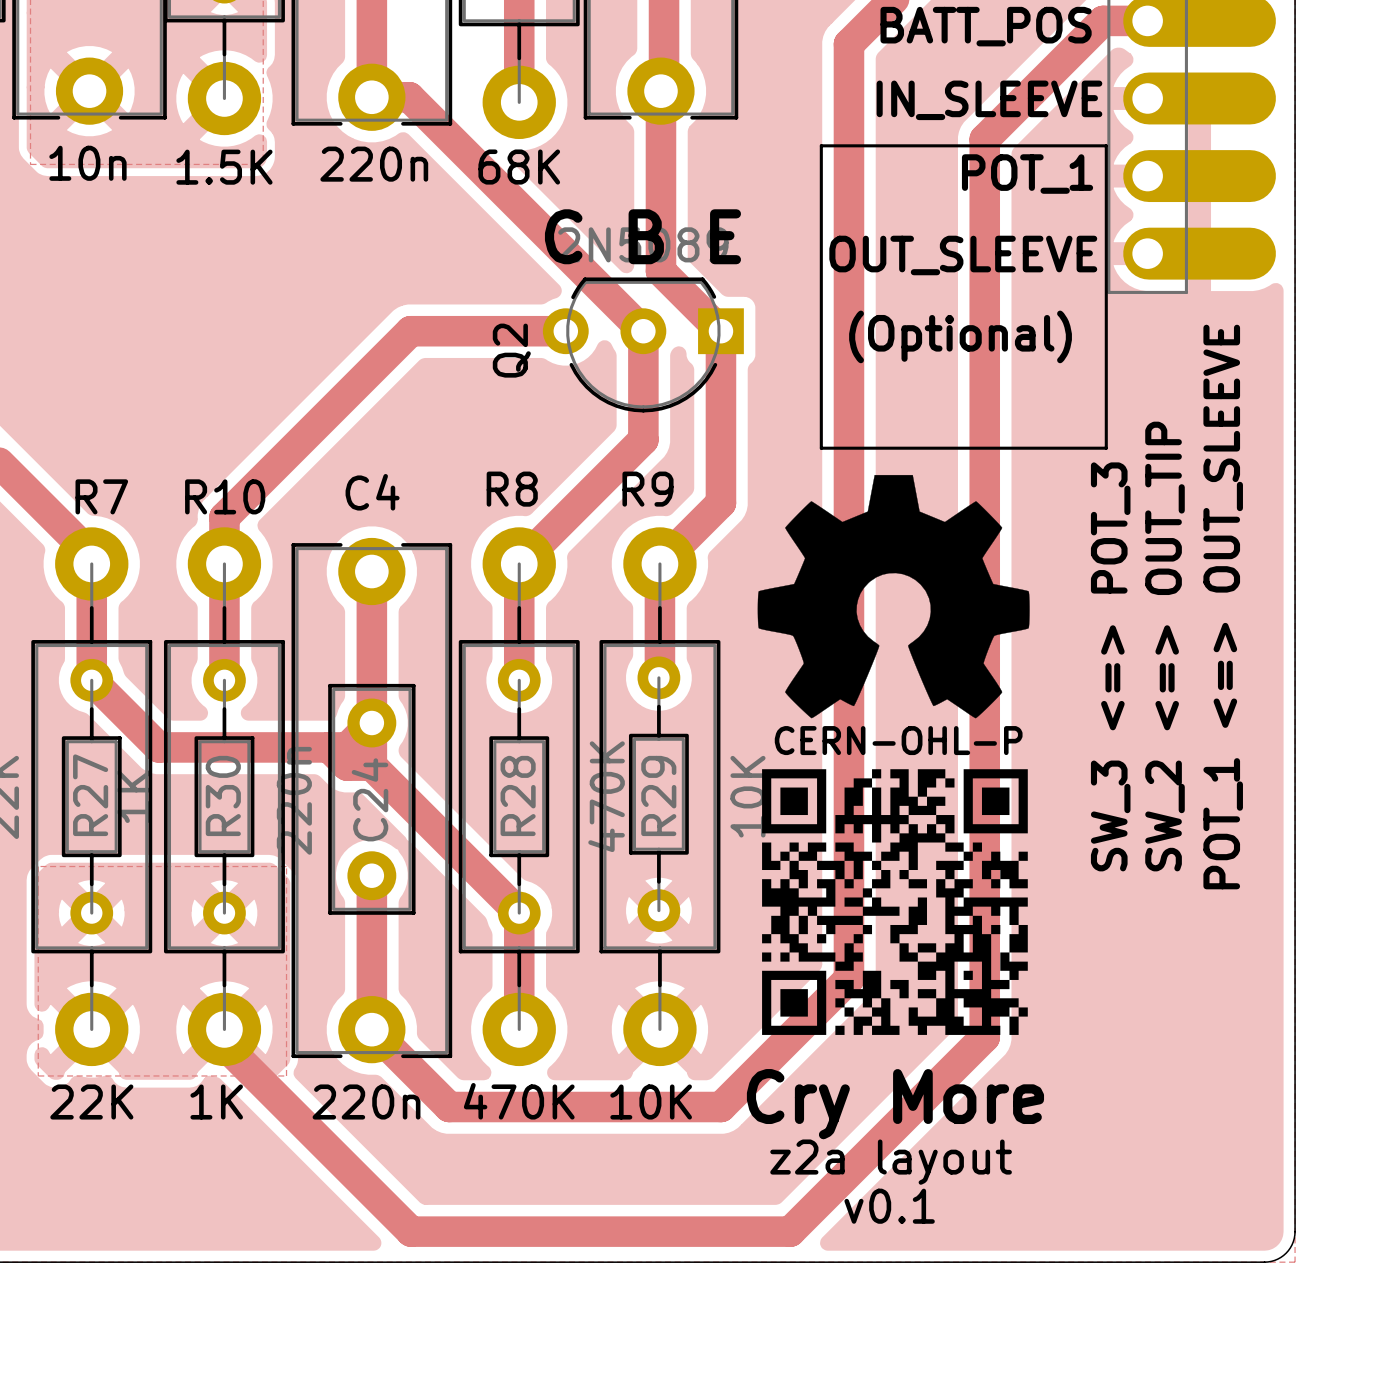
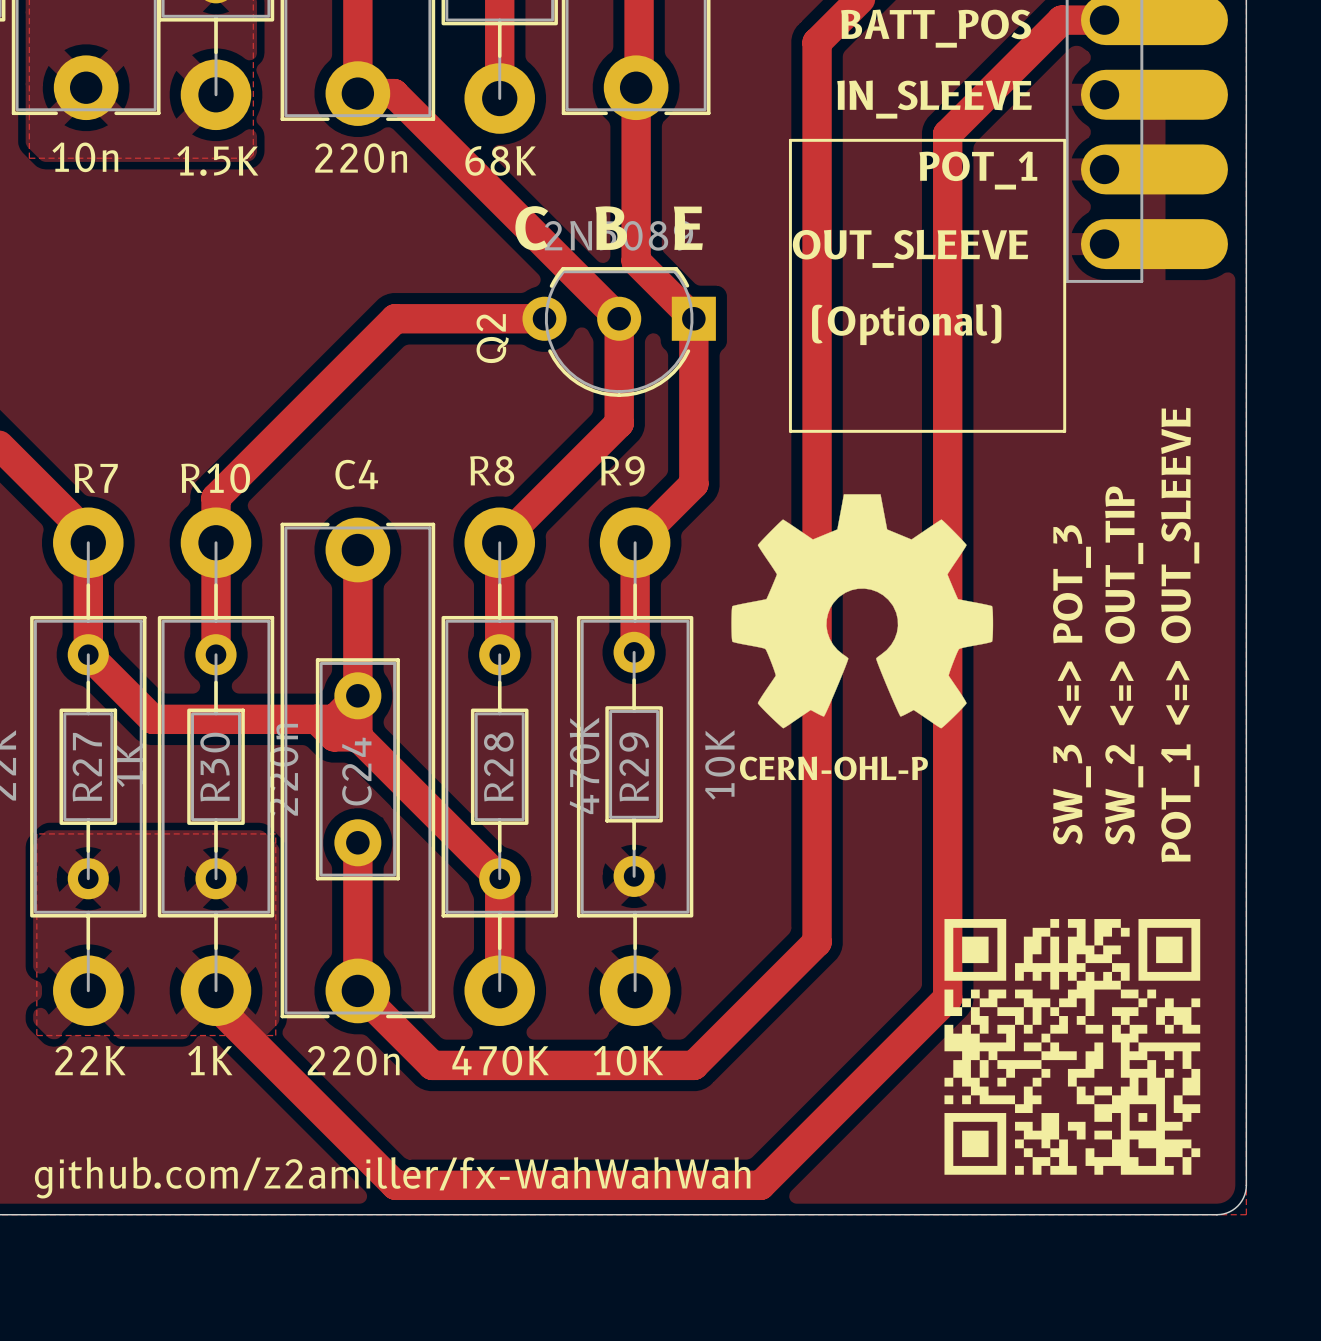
drawing position: (893, 596) -> (862, 611)
text position: CERN-OHL-P (898, 740) -> CERN-OHL-P (833, 768)
drawing position: (894, 902) -> (1072, 1046)
text: Cry More (895, 1104) -> none
text: z2a layout (891, 1162) -> none
text: v0.1 (889, 1206) -> none
text: none -> github.com/z2amiller/fx-WahWahWah (392, 1177)

